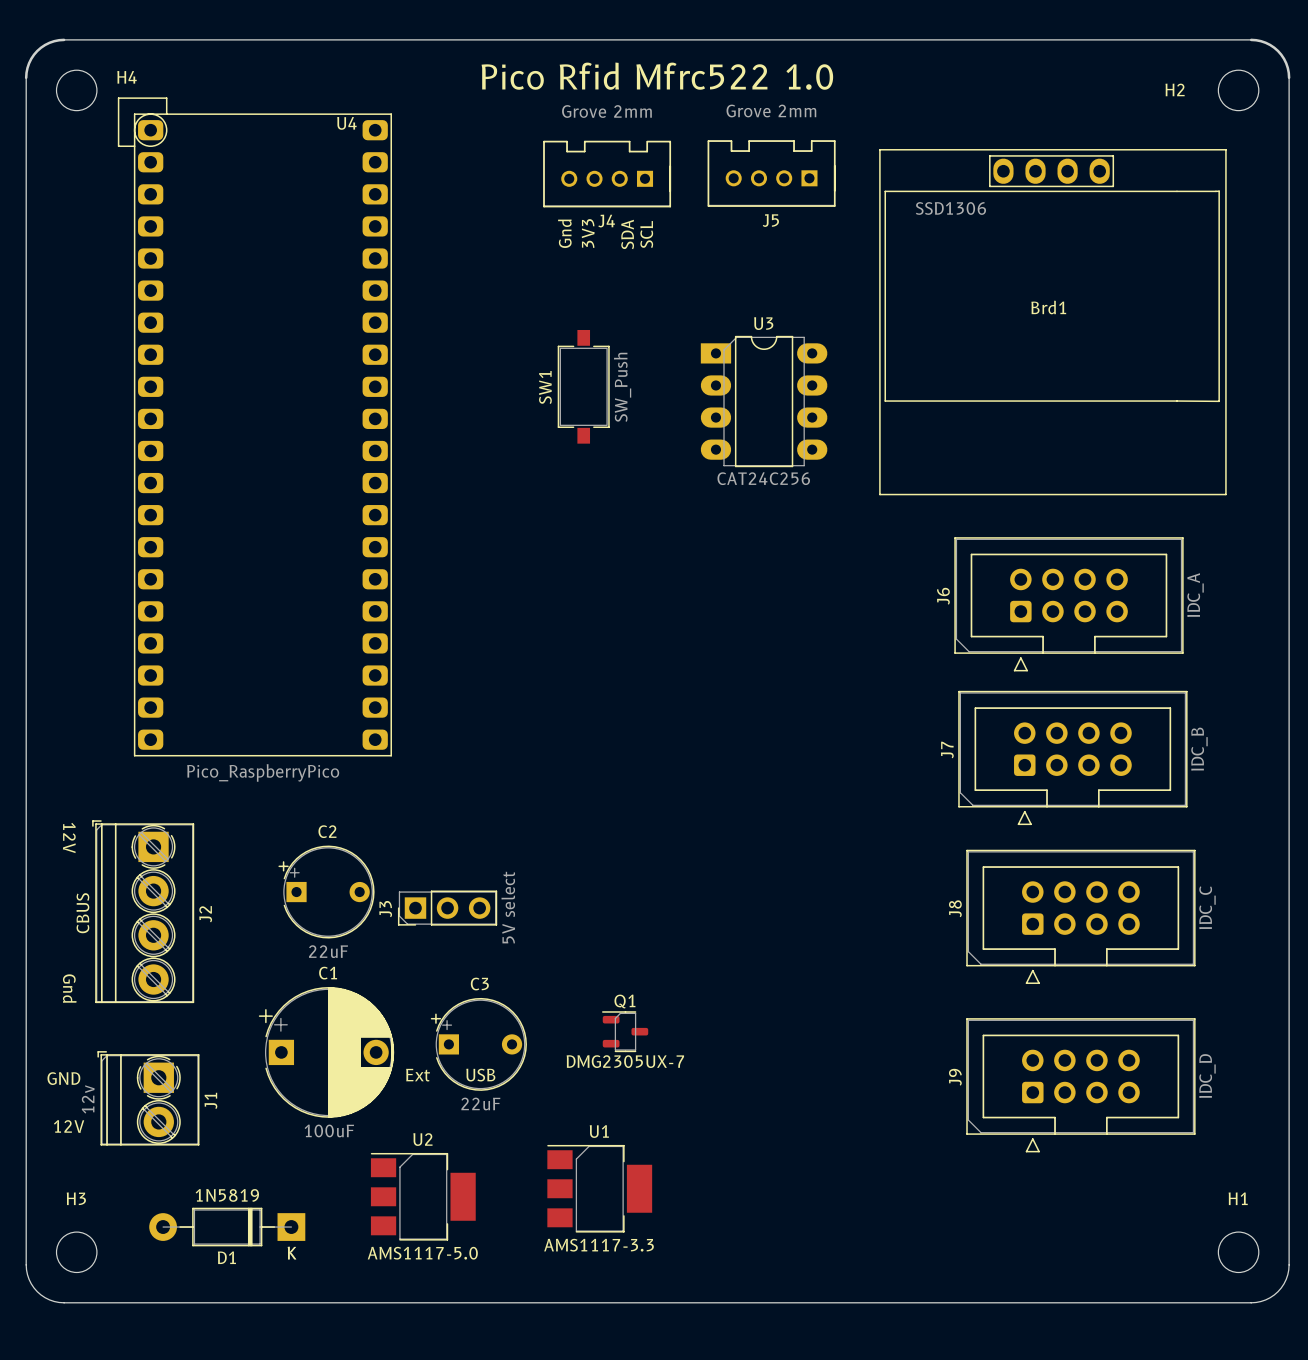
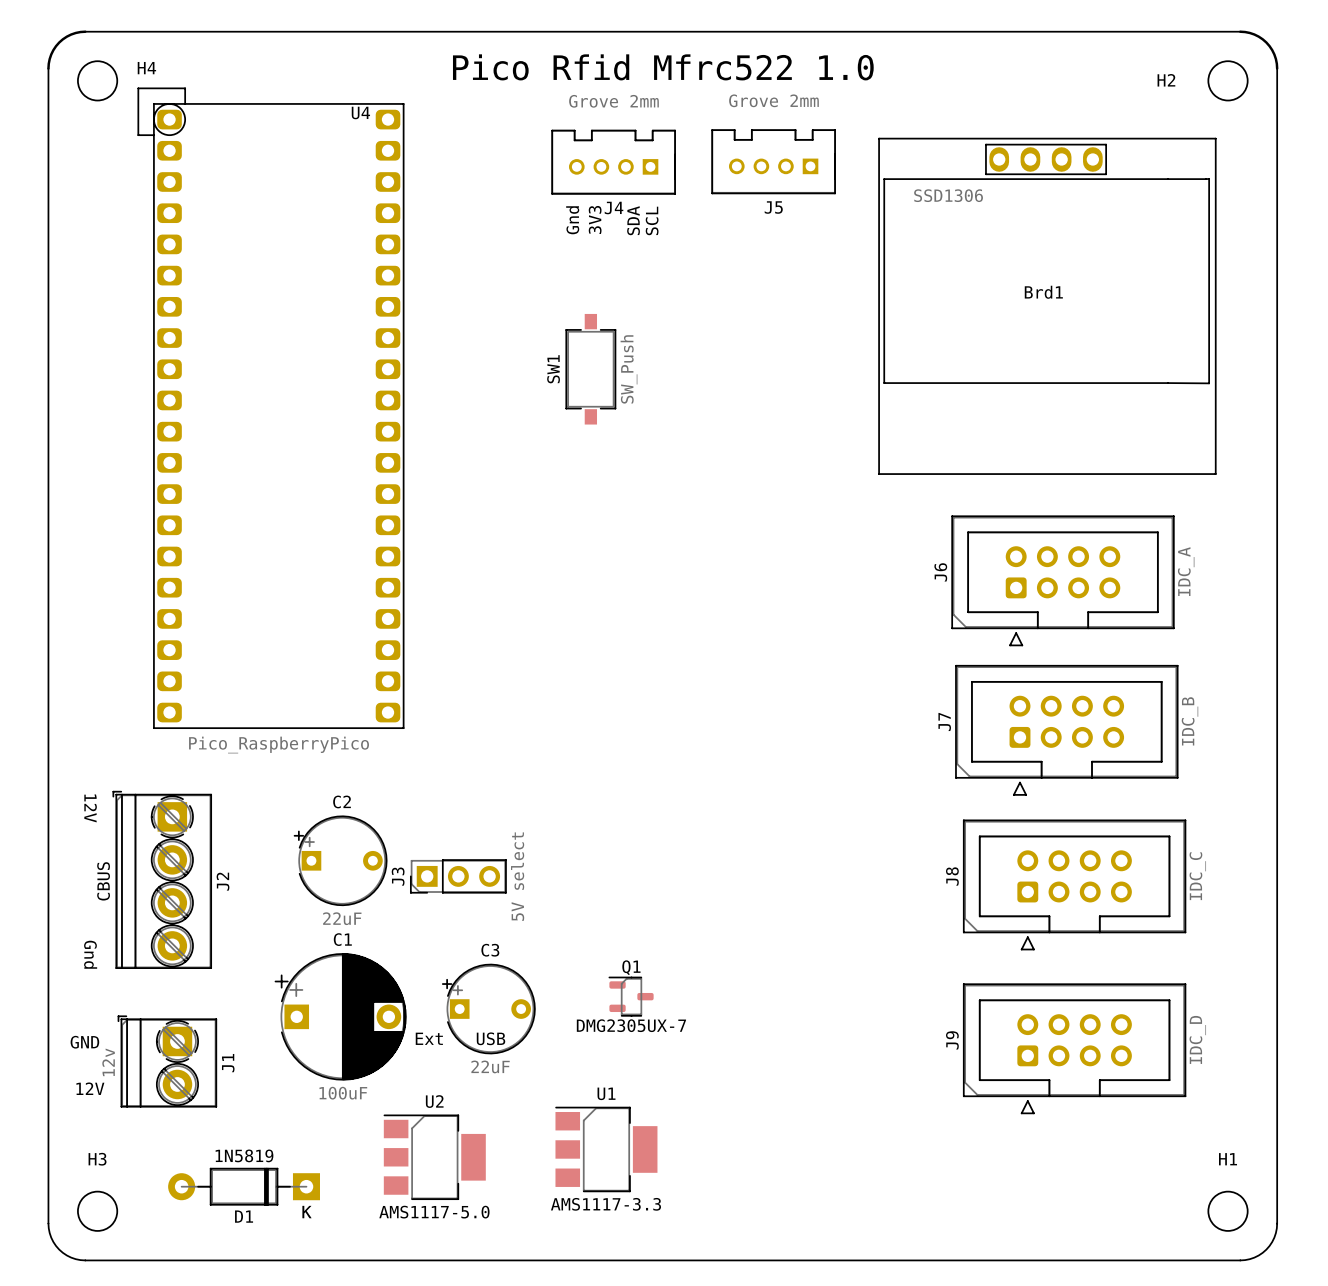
U3: CAT24C256 (764, 401) -> none

